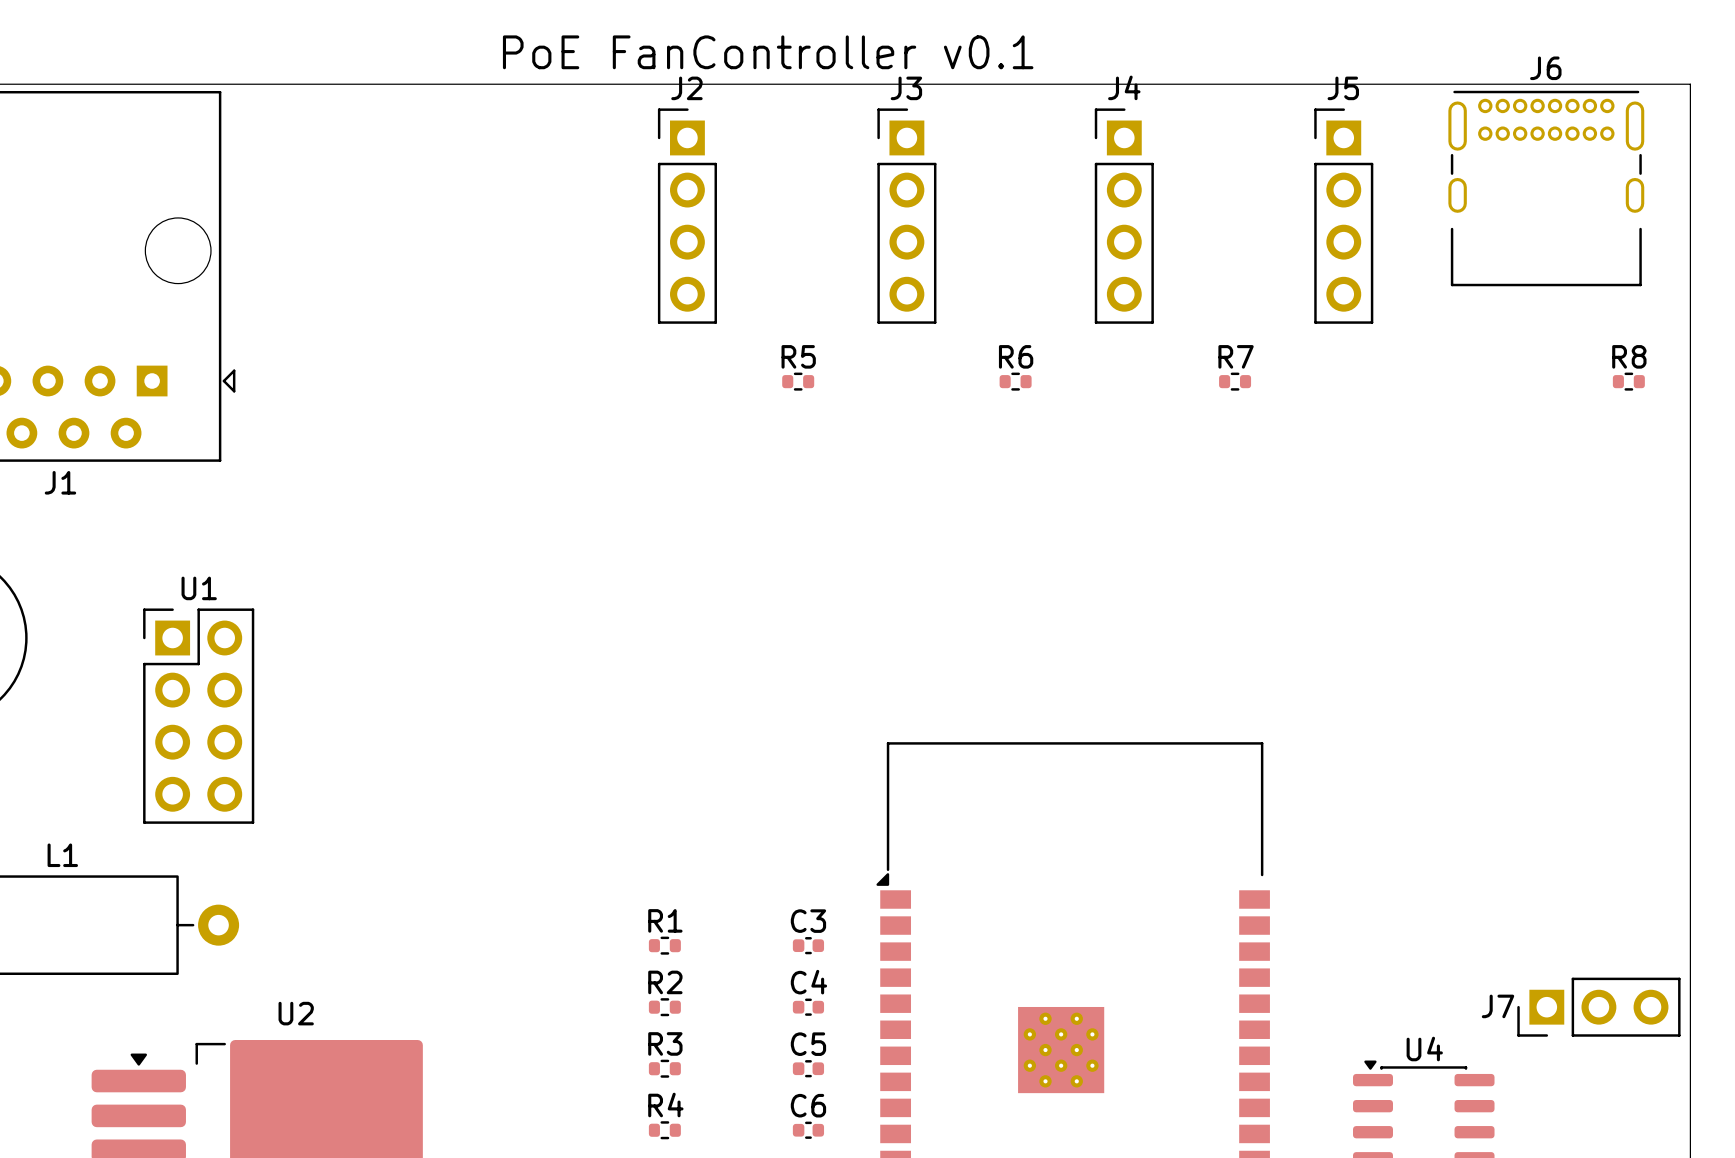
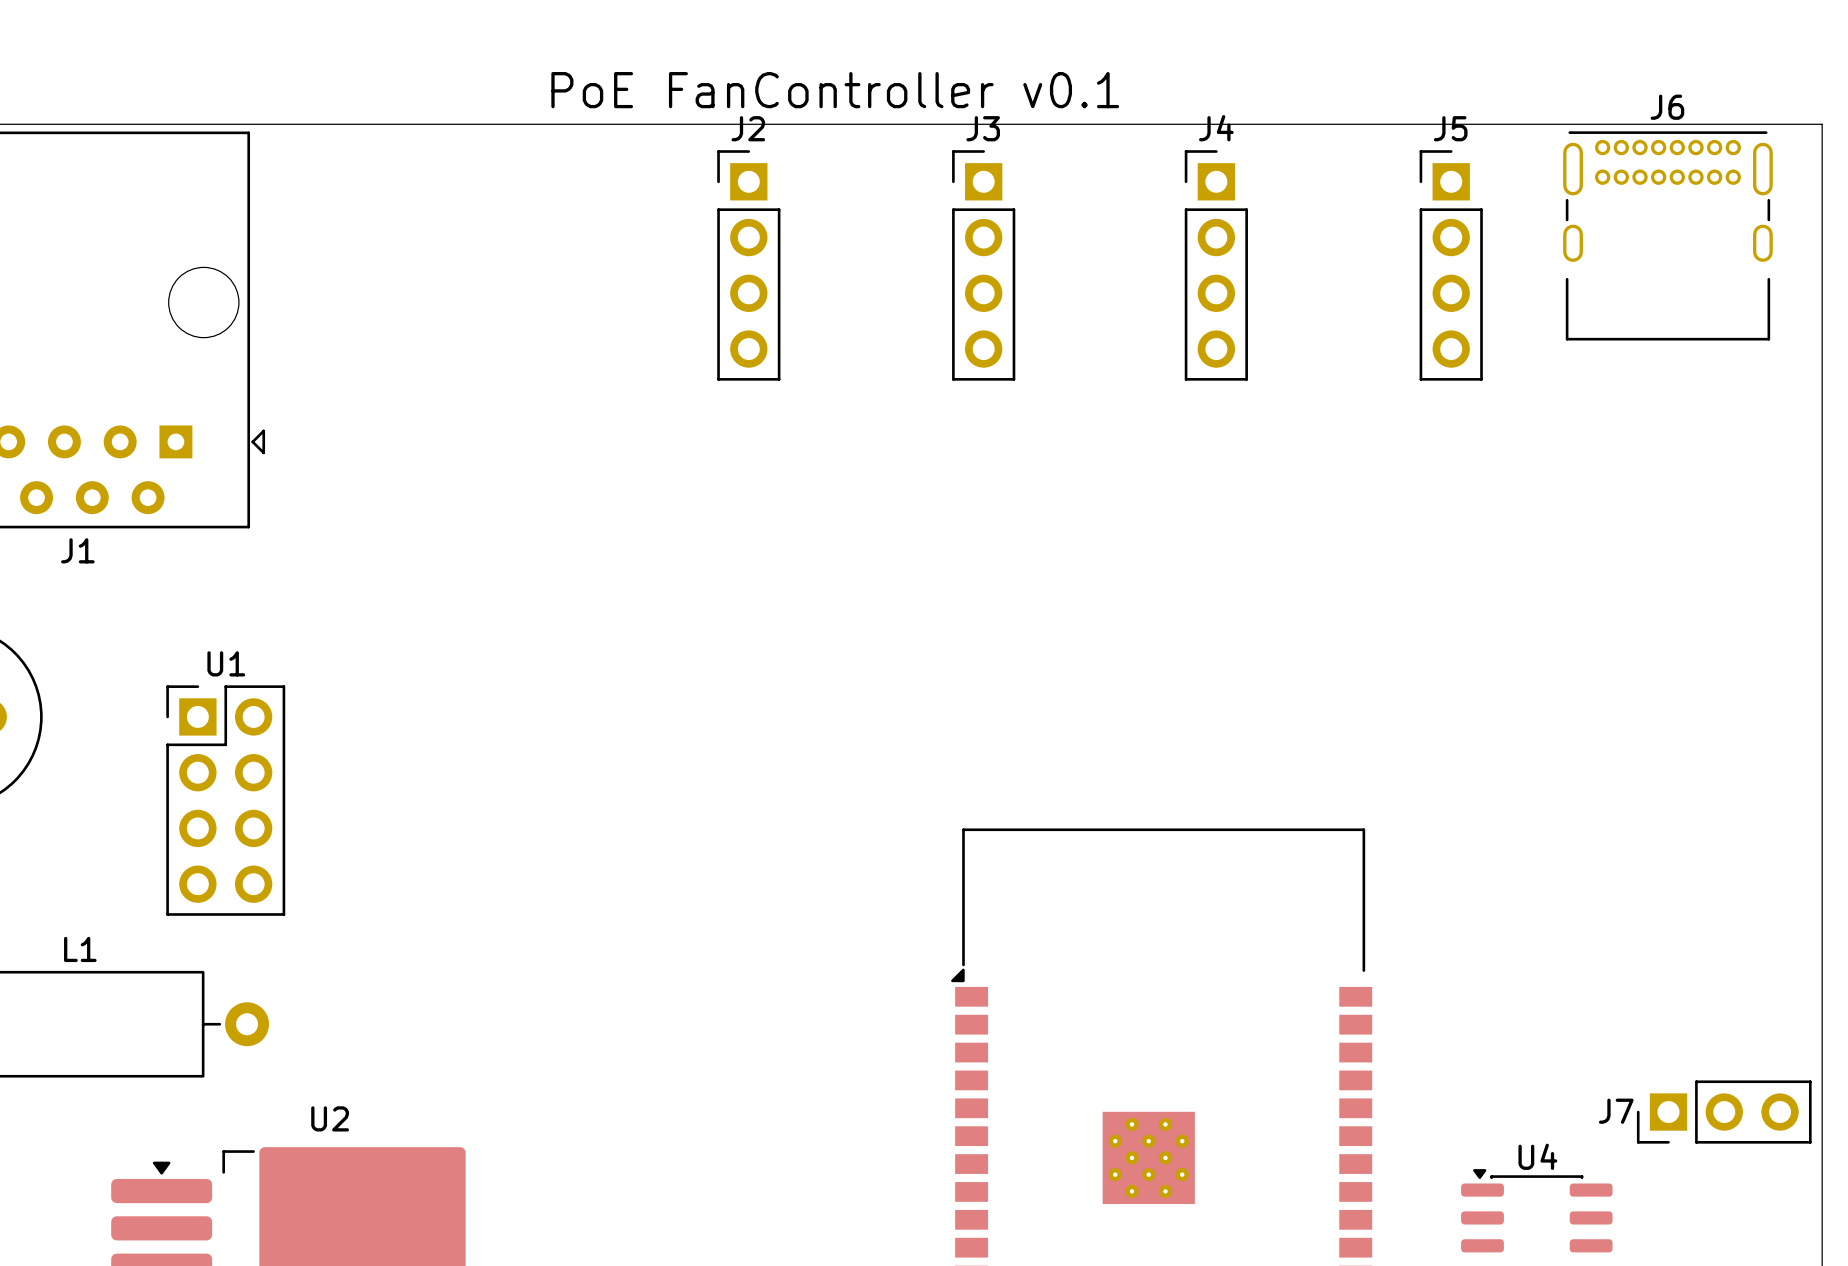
R5: (798, 381) -> none
R6: (1015, 381) -> none
R7: (1235, 381) -> none
R8: (1628, 381) -> none
R1: (664, 945) -> none
C3: (808, 945) -> none
R2: (664, 1007) -> none
C4: (808, 1007) -> none
R3: (664, 1068) -> none
C5: (808, 1068) -> none
R4: (664, 1130) -> none
C6: (808, 1130) -> none

